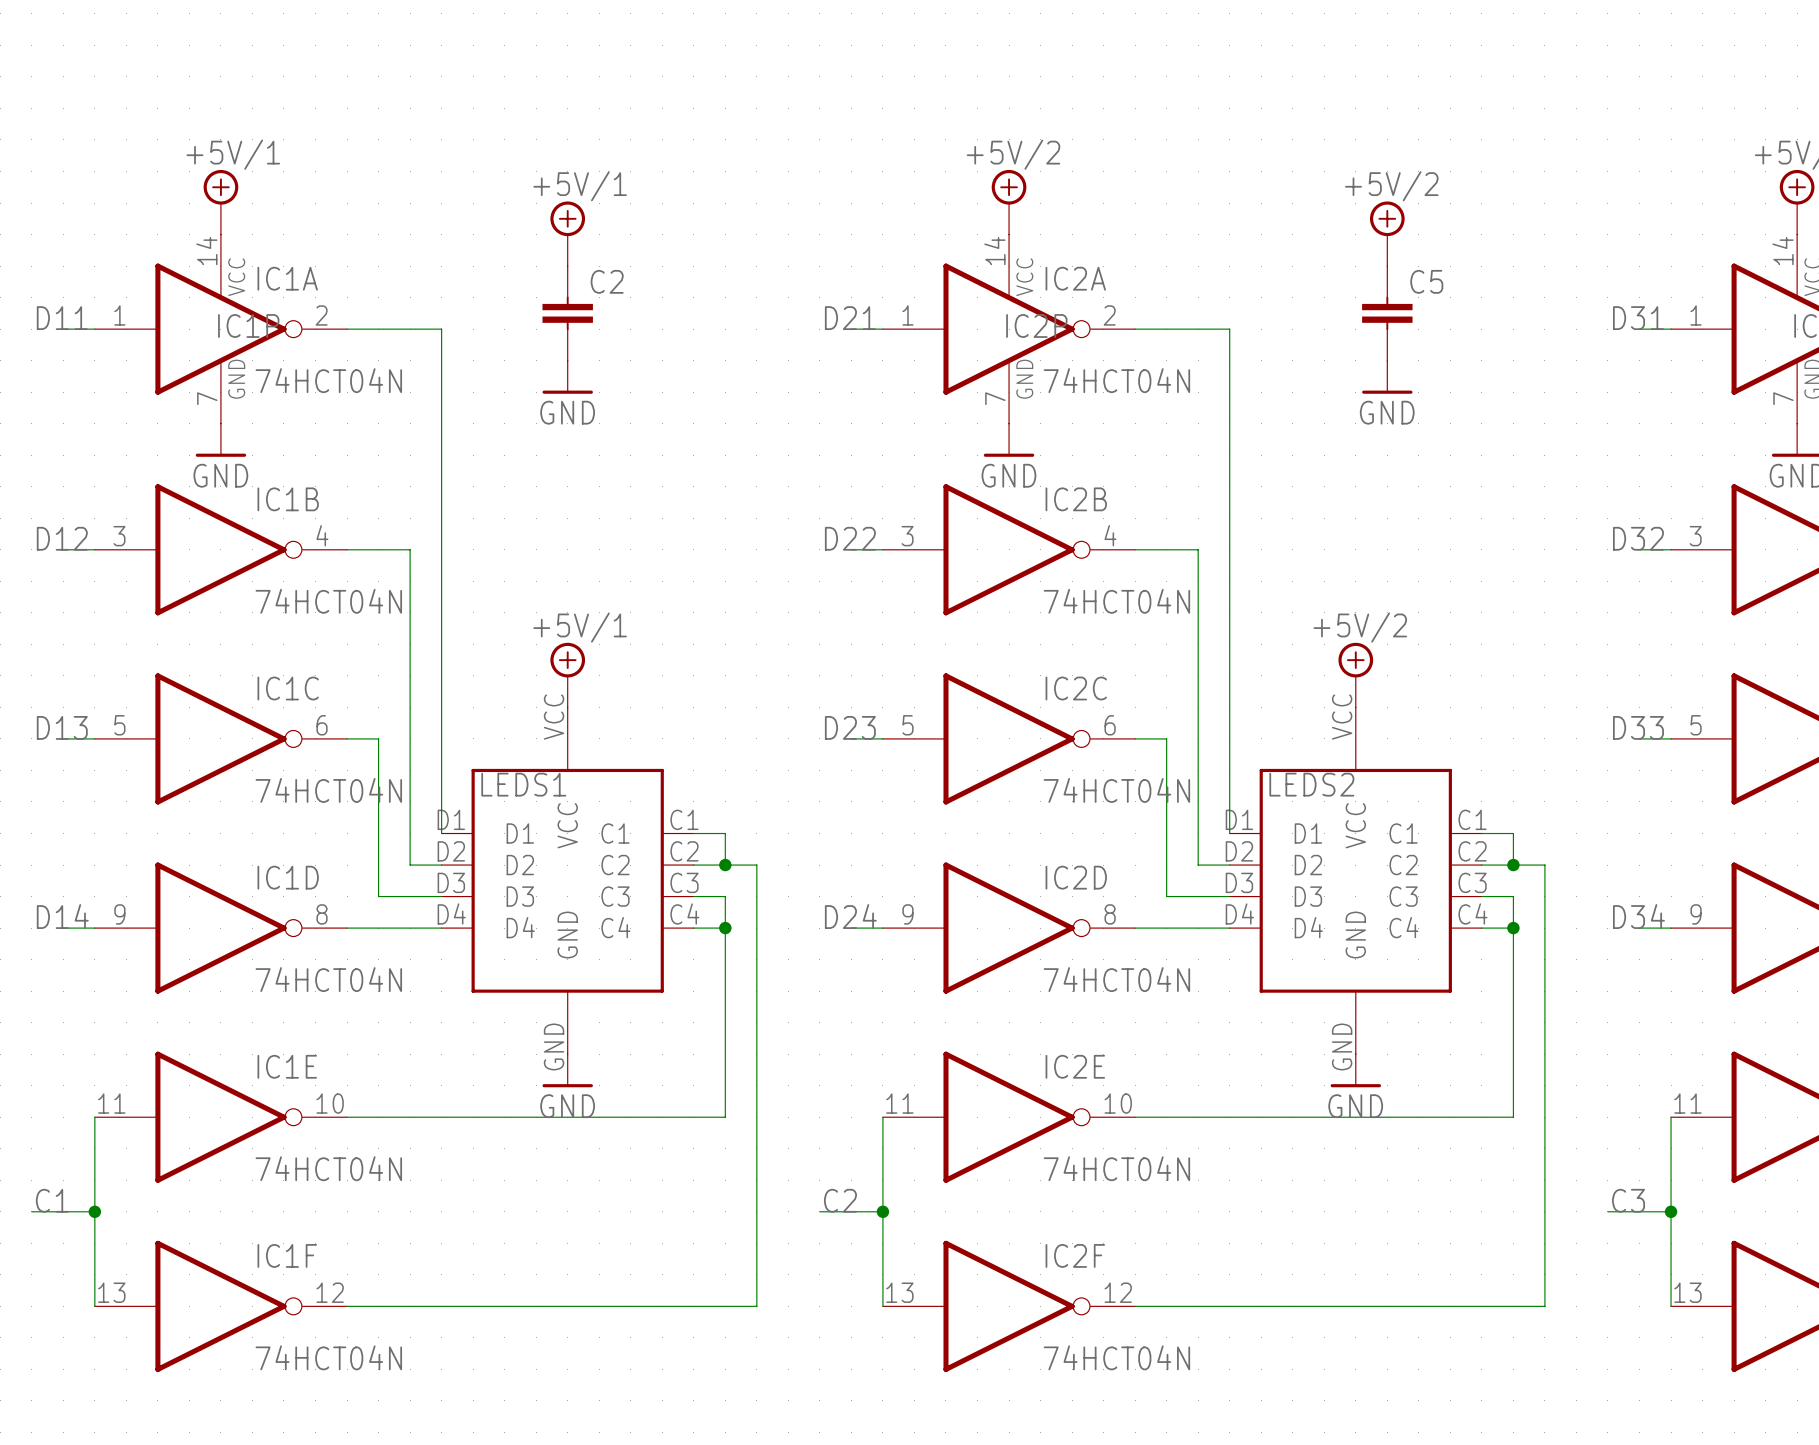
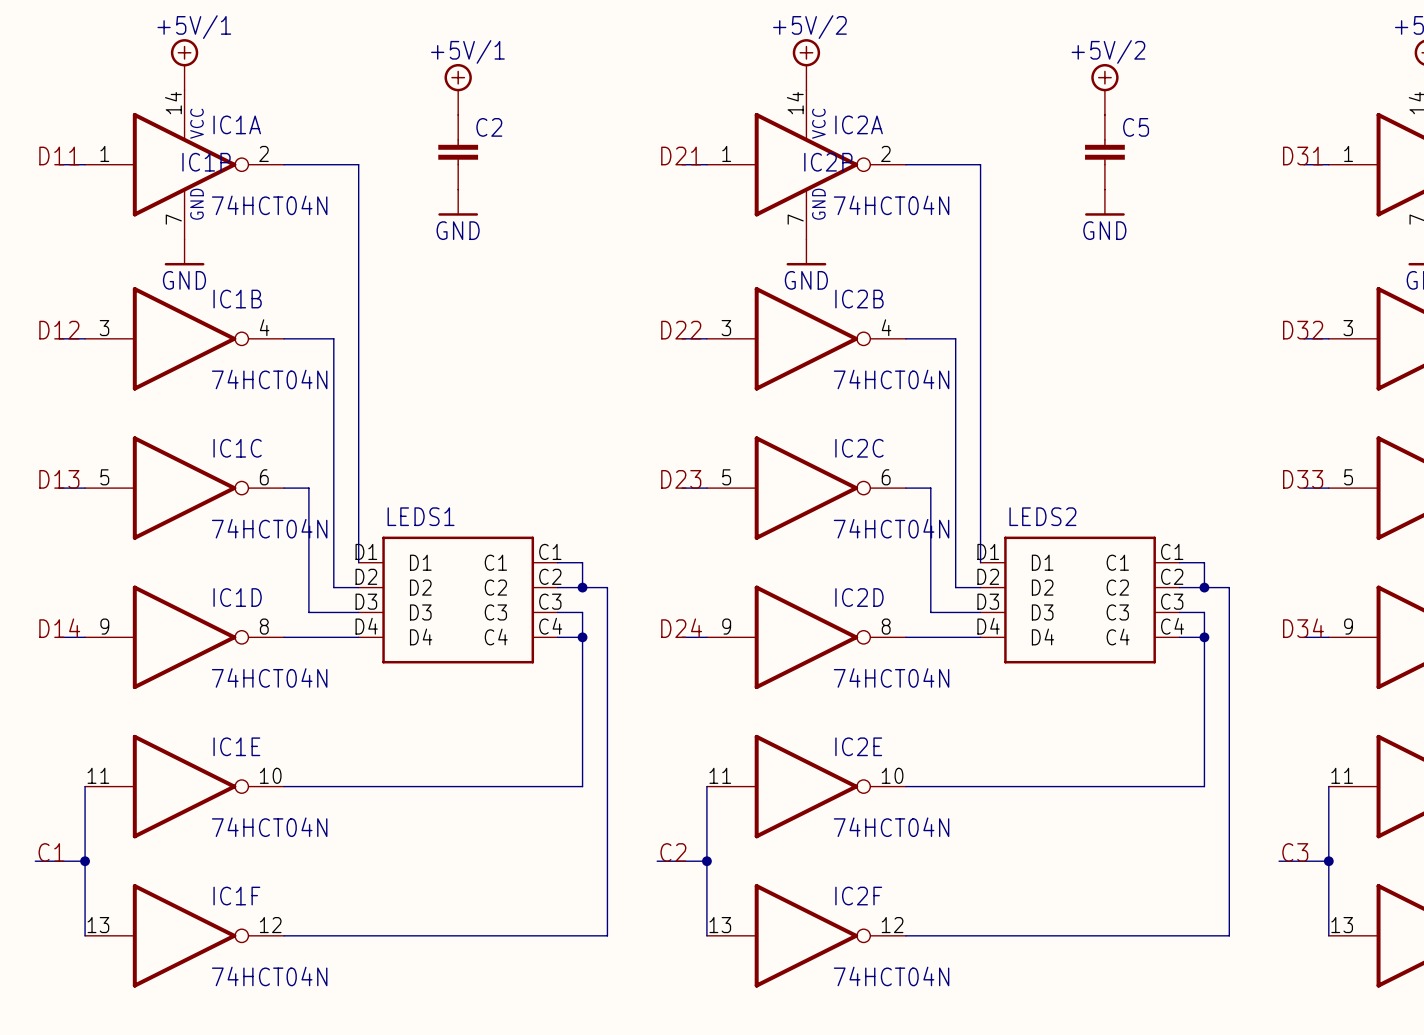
power symbol: +5V/1 (567, 675) -> none
power symbol: +5V/2 (1355, 675) -> none
LEDS1 symbol: [441, 707, 694, 1055] -> [358, 536, 558, 664]
LEDS2 symbol: [1229, 707, 1482, 1055] -> [980, 536, 1180, 664]
power symbol: GND (567, 1070) -> none
power symbol: GND (1355, 1070) -> none

